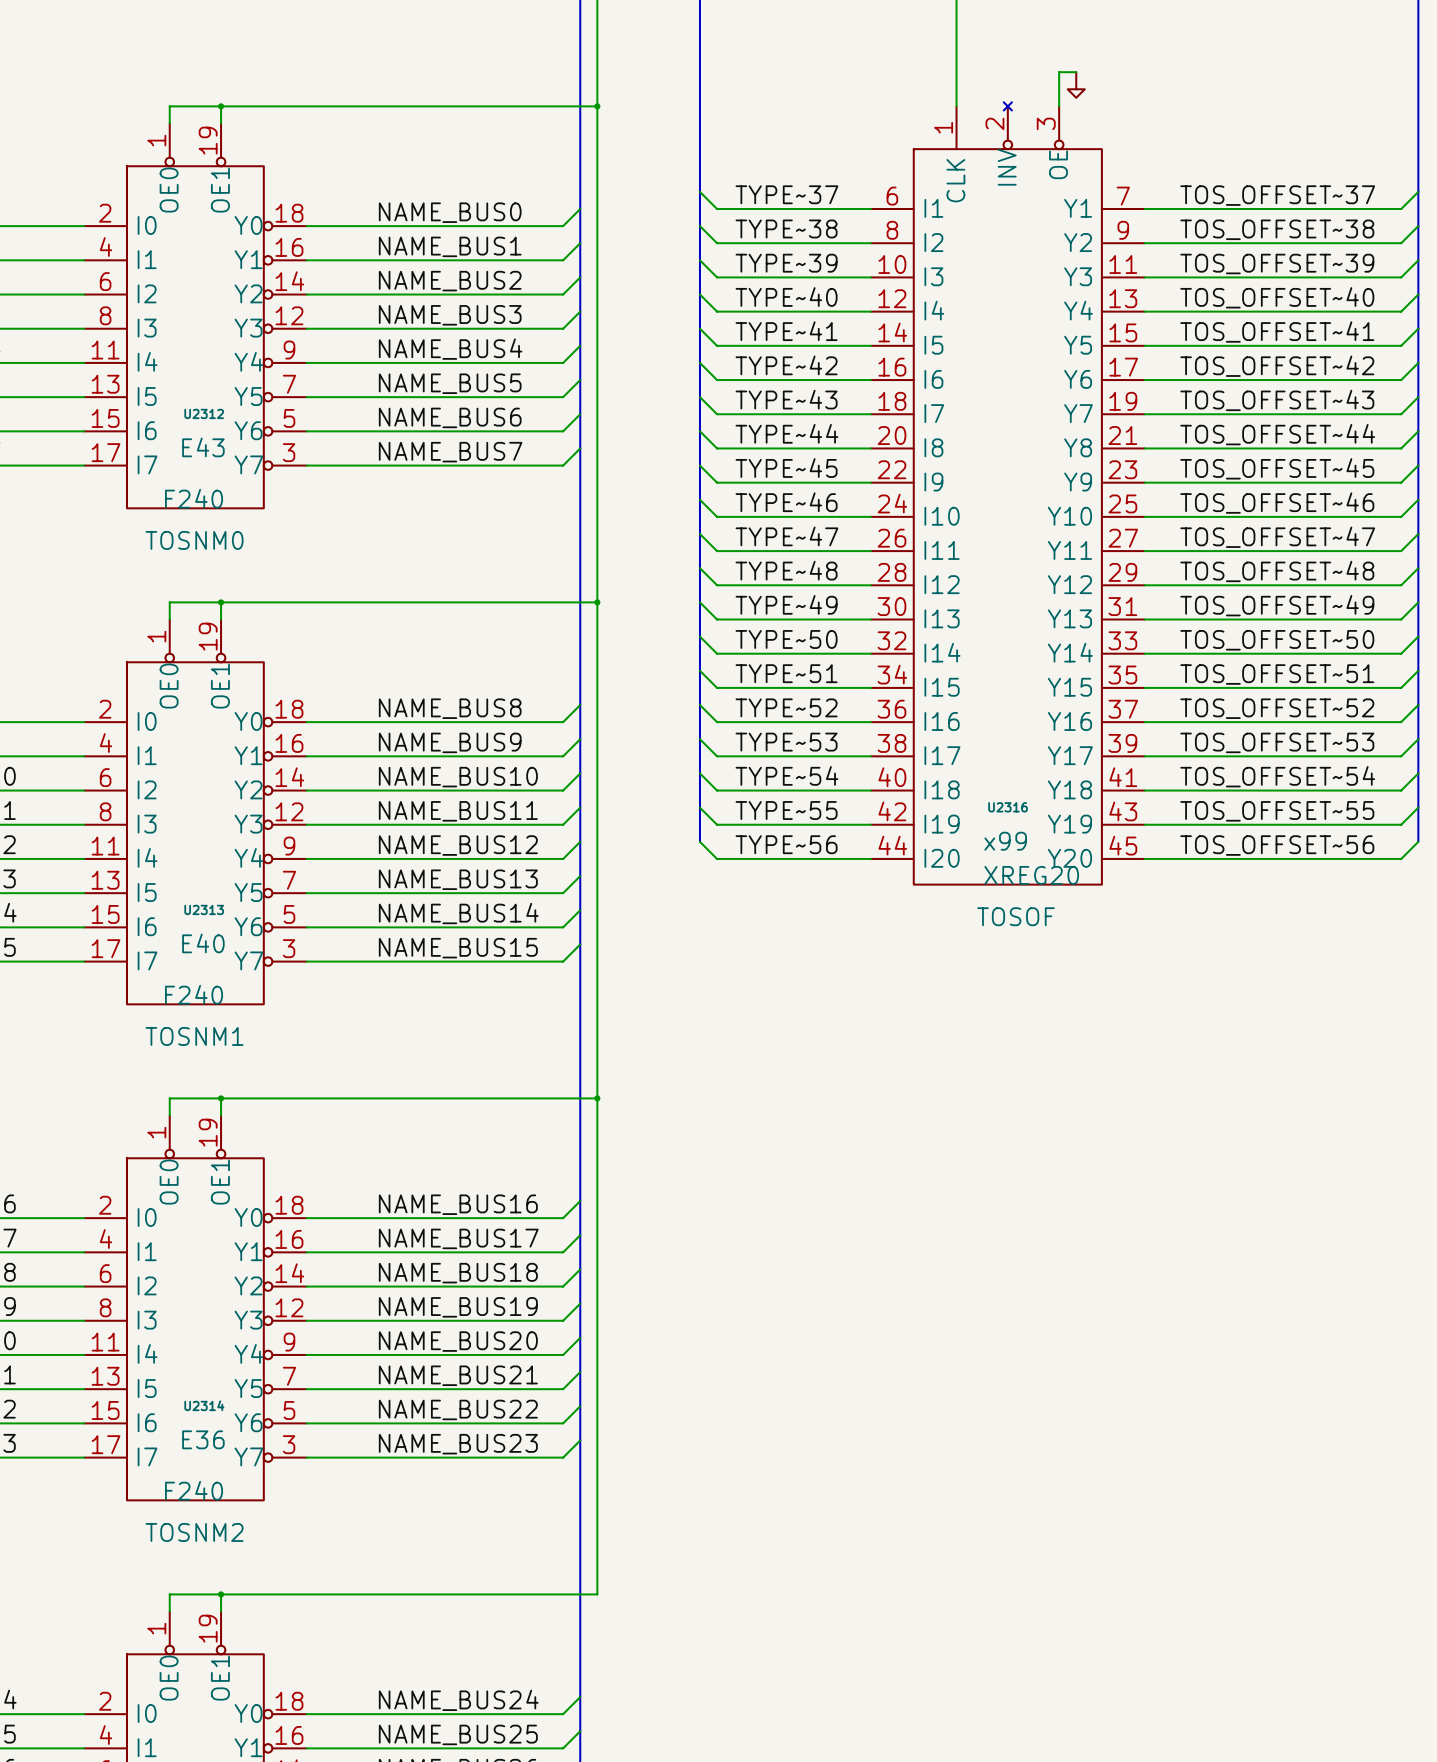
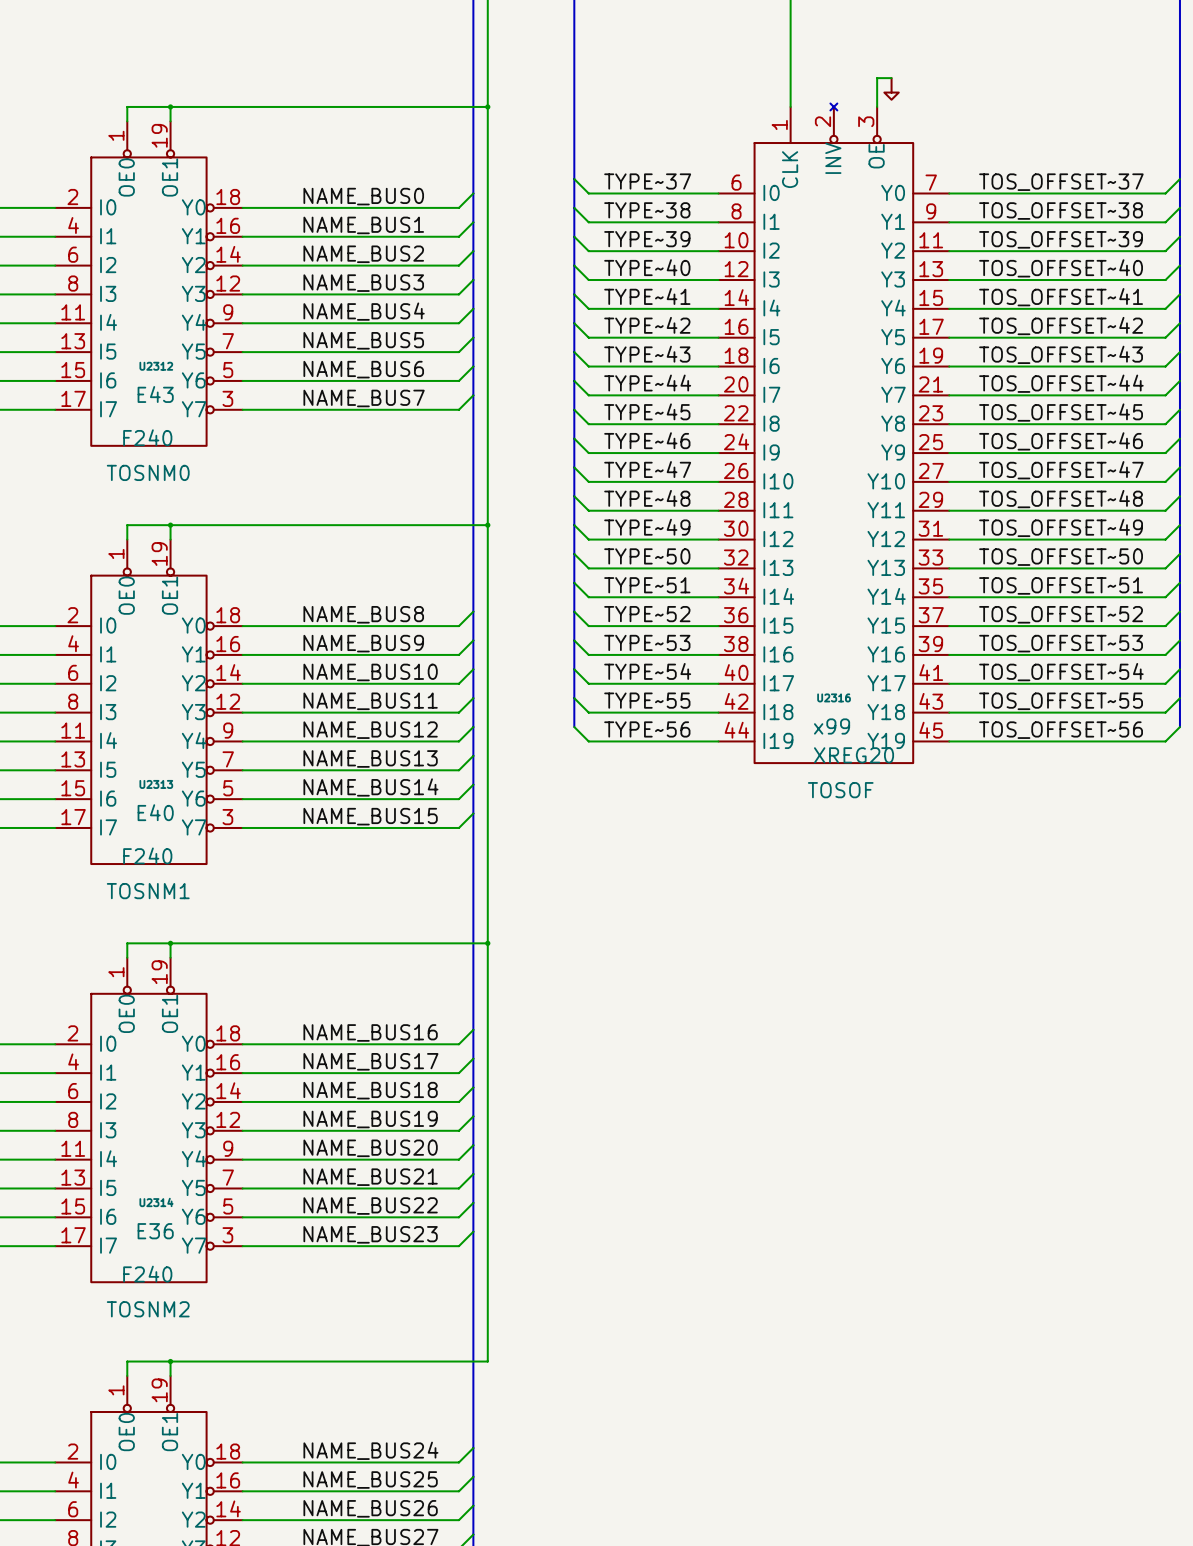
U2316 symbol: [871, 106, 1145, 885] -> [718, 106, 950, 764]

